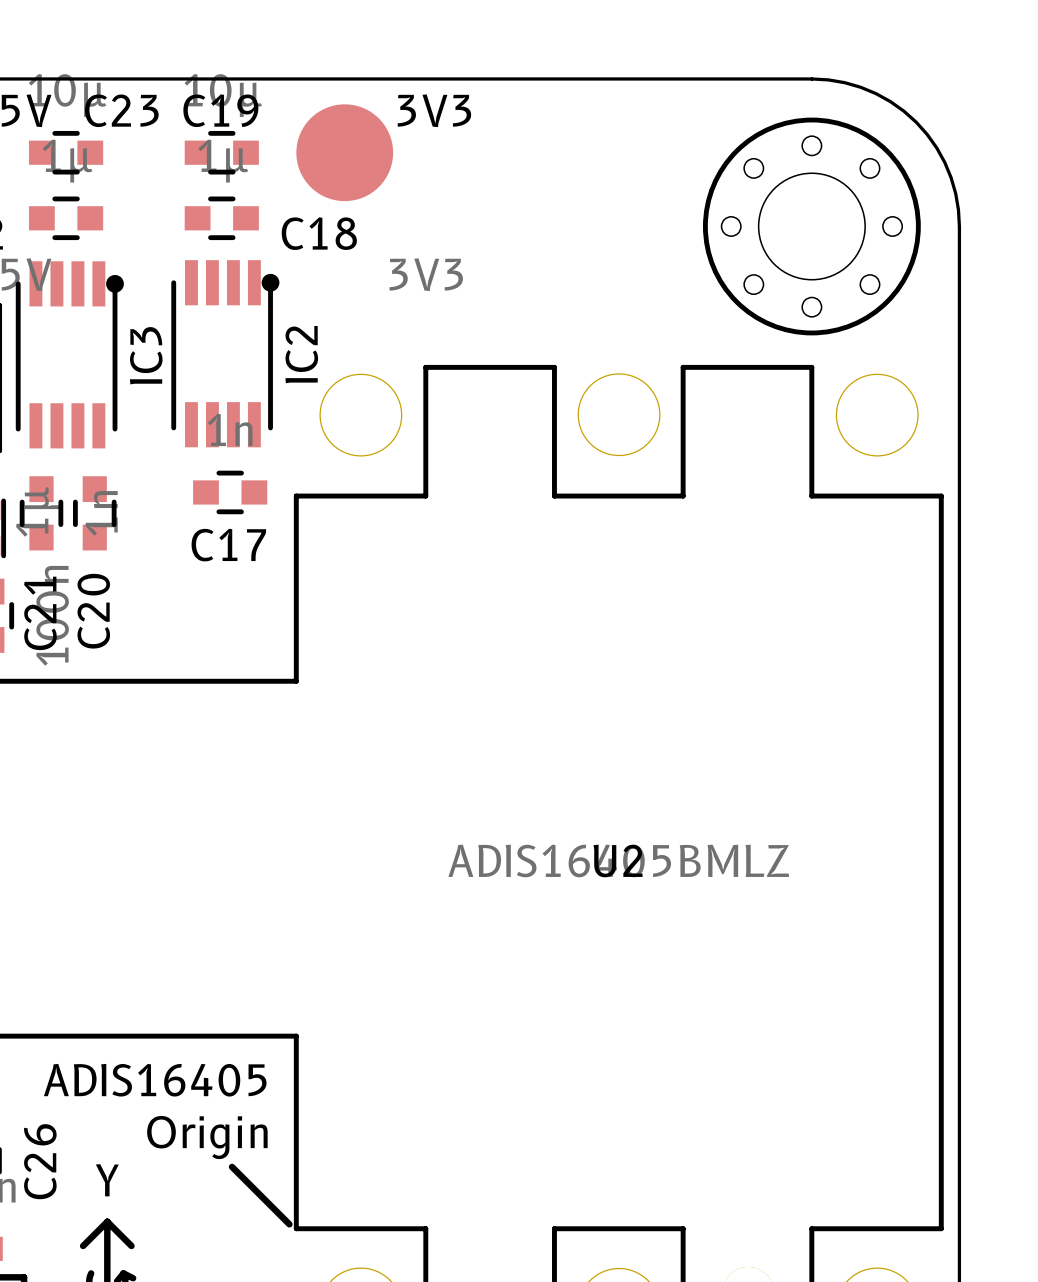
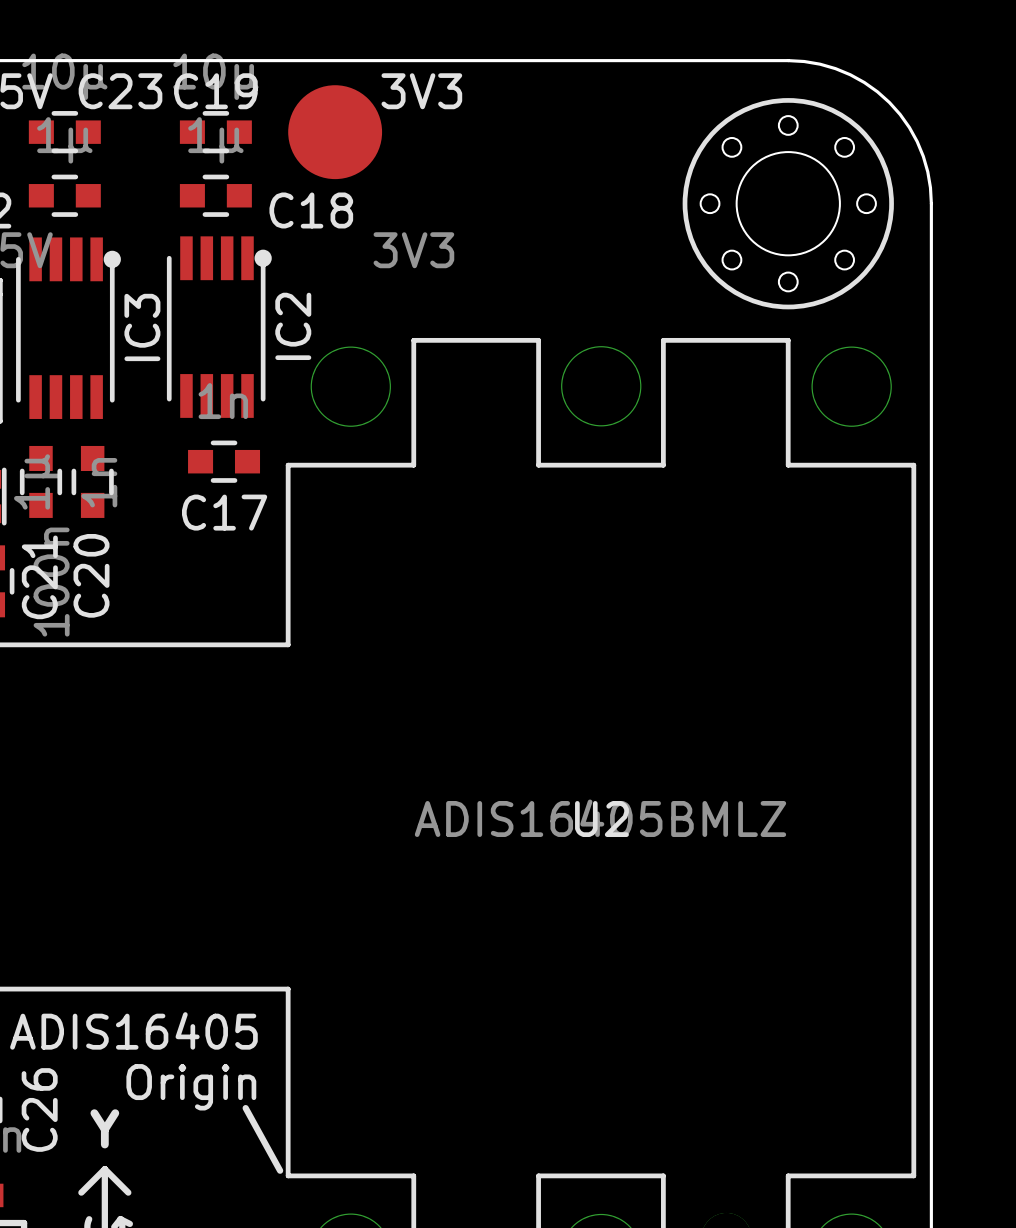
line: none -> (245, 1108) (280, 1170)
line: (232, 1166) (289, 1224) -> none

